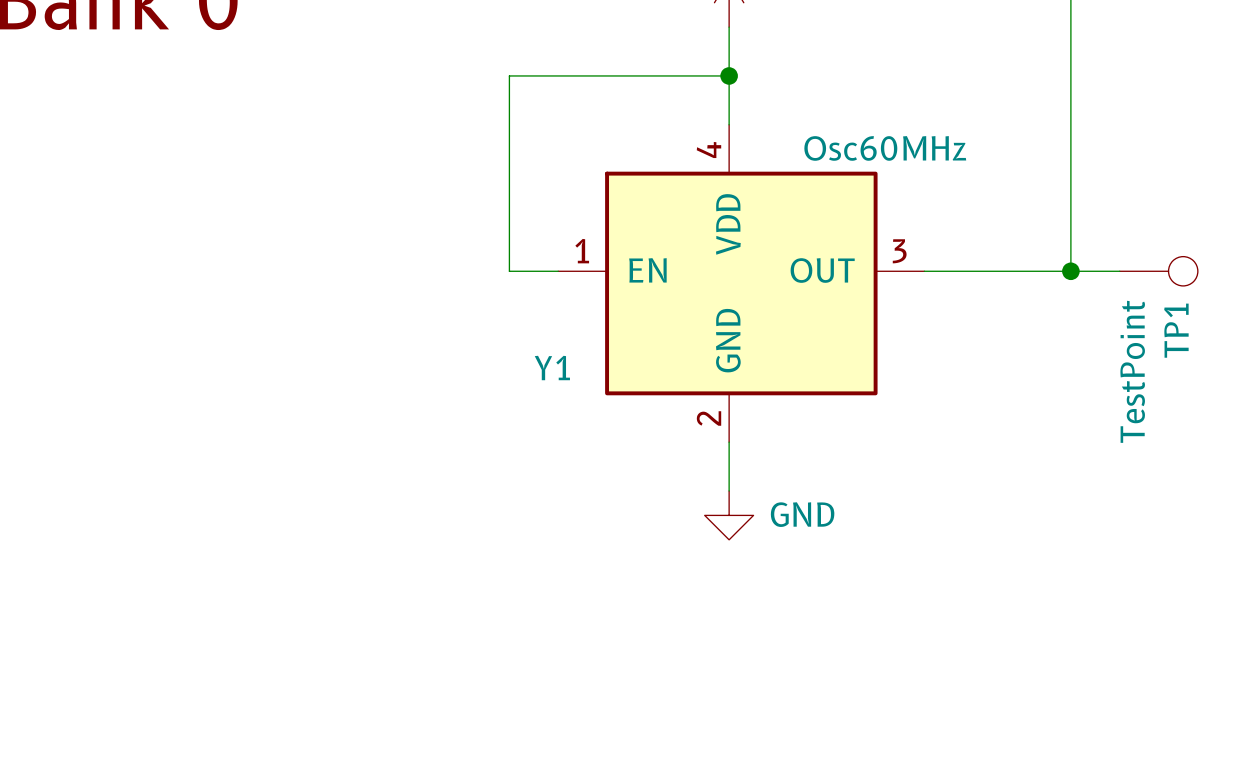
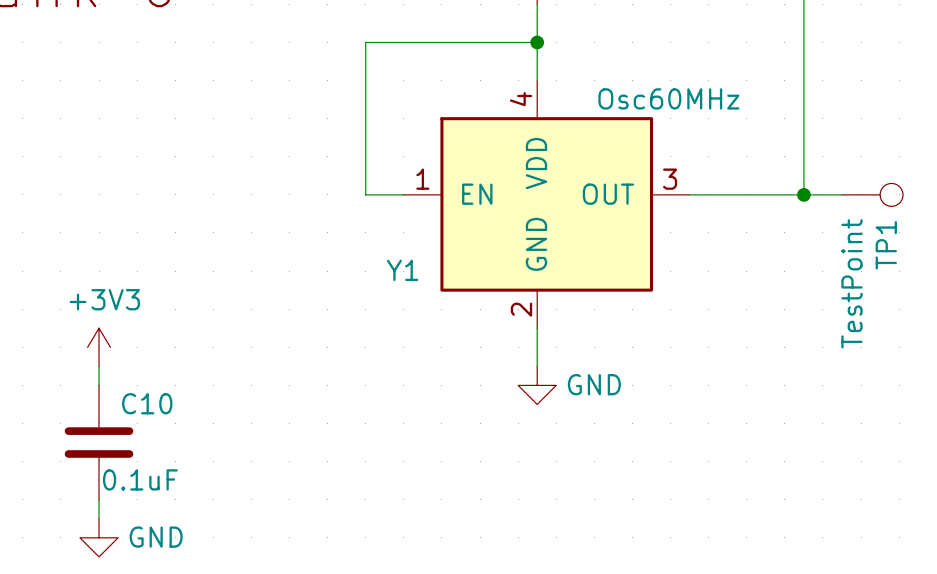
power symbol: none -> +3V3 (99, 347)
wire: none -> (99, 366) (99, 385)
C10: none -> 0.1uF (99, 442)
wire: none -> (99, 499) (99, 518)
power symbol: none -> GND (99, 537)

